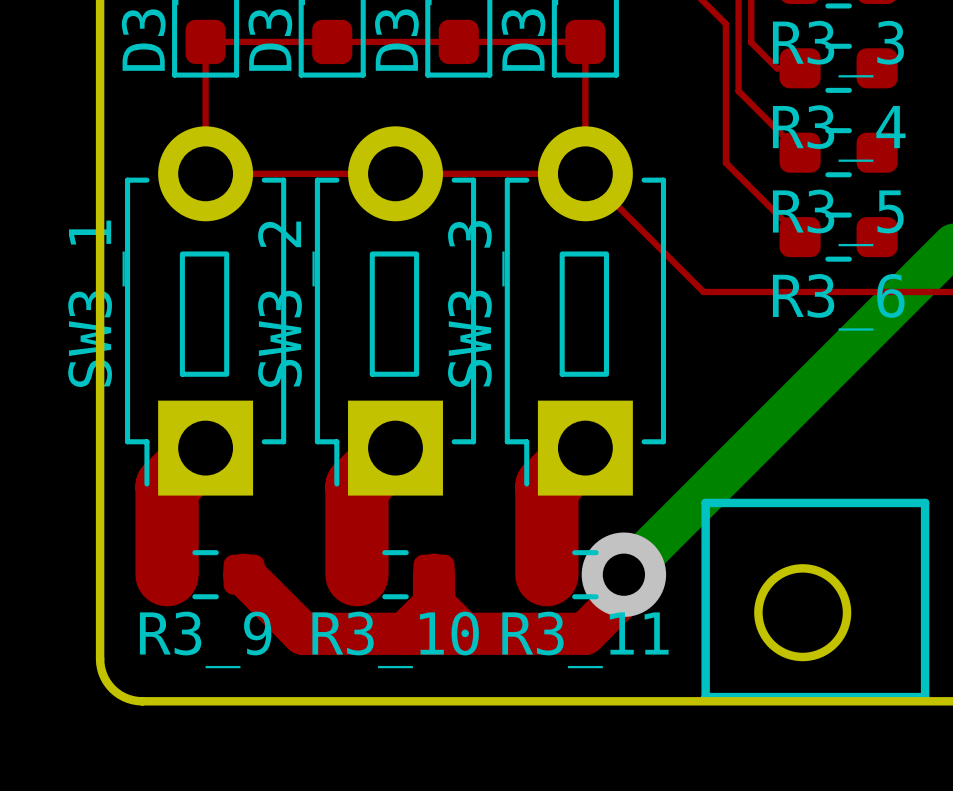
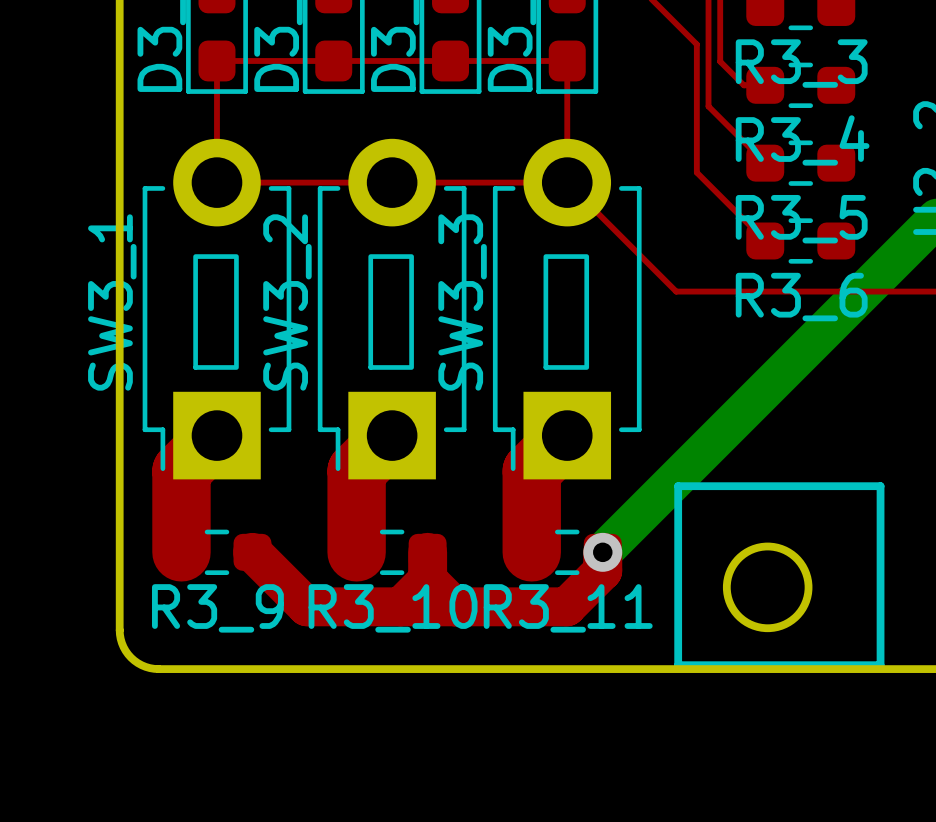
via size: [581, 532, 667, 617] -> [583, 532, 623, 572]

